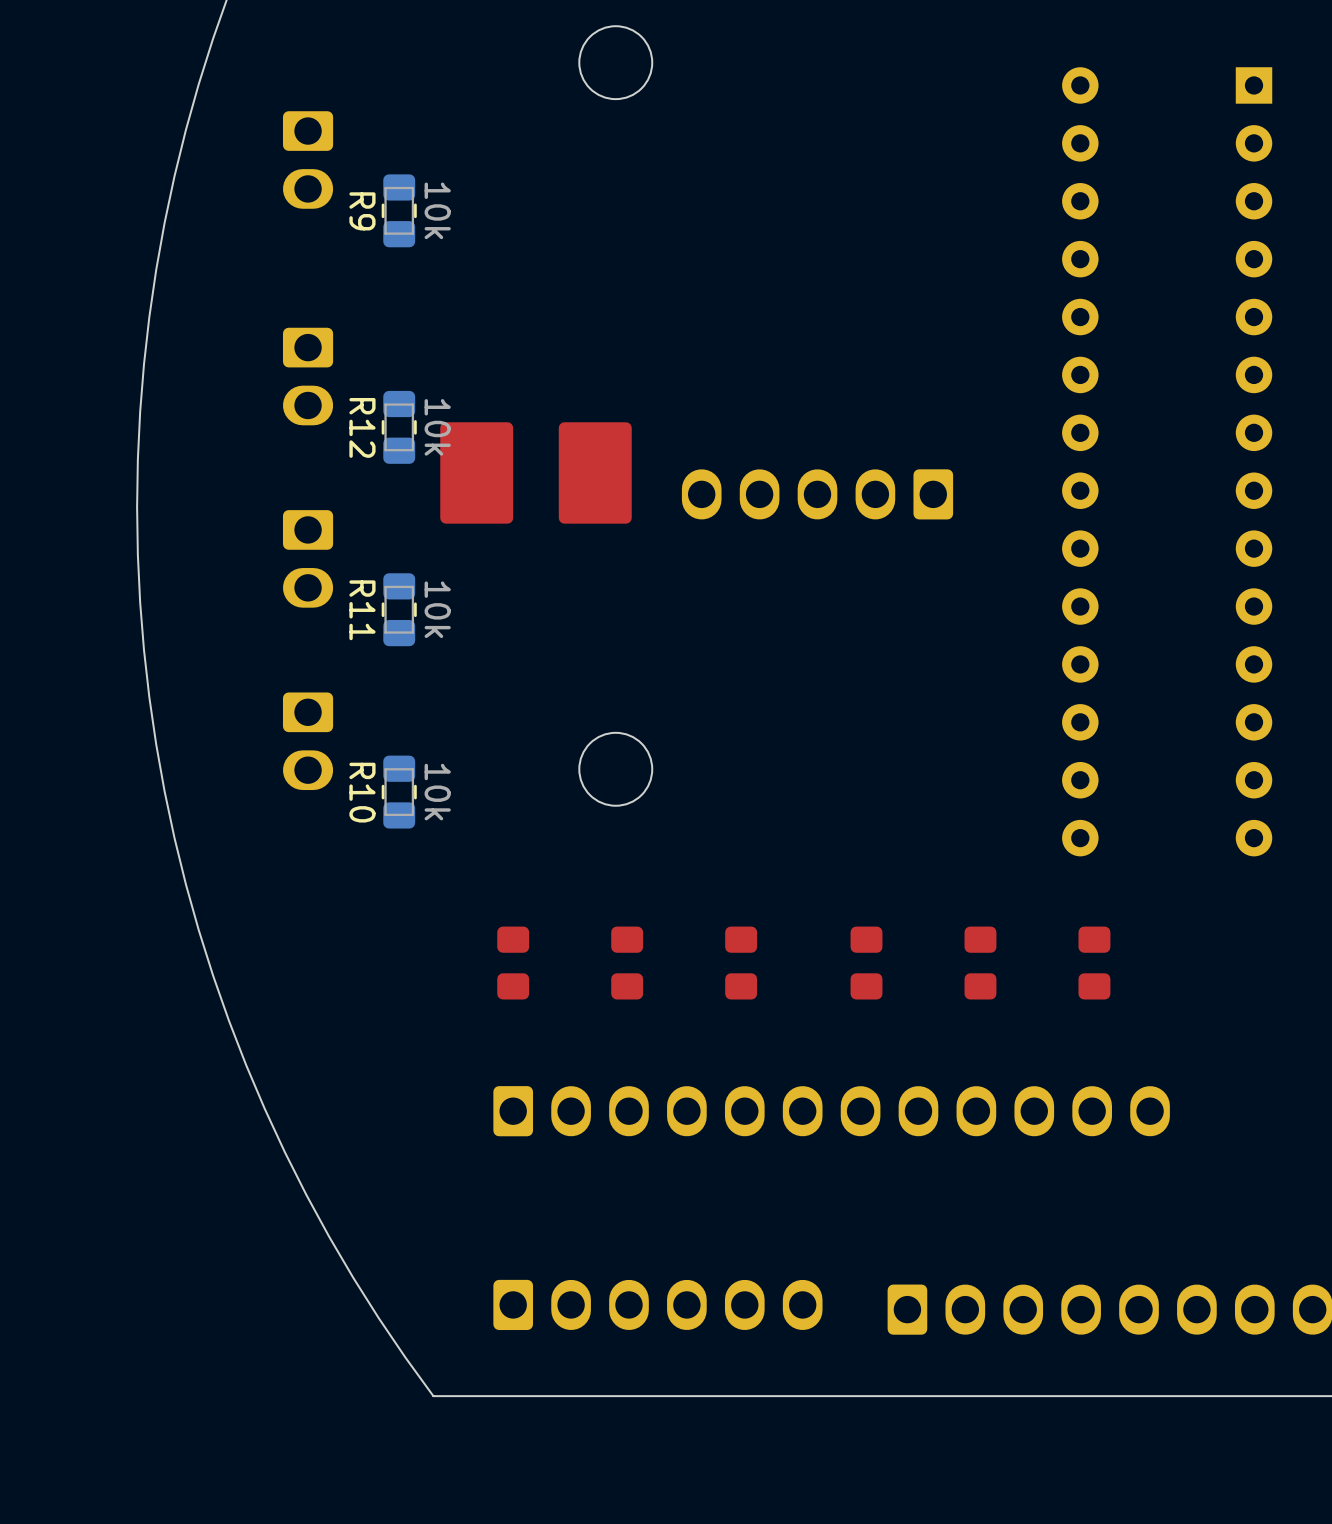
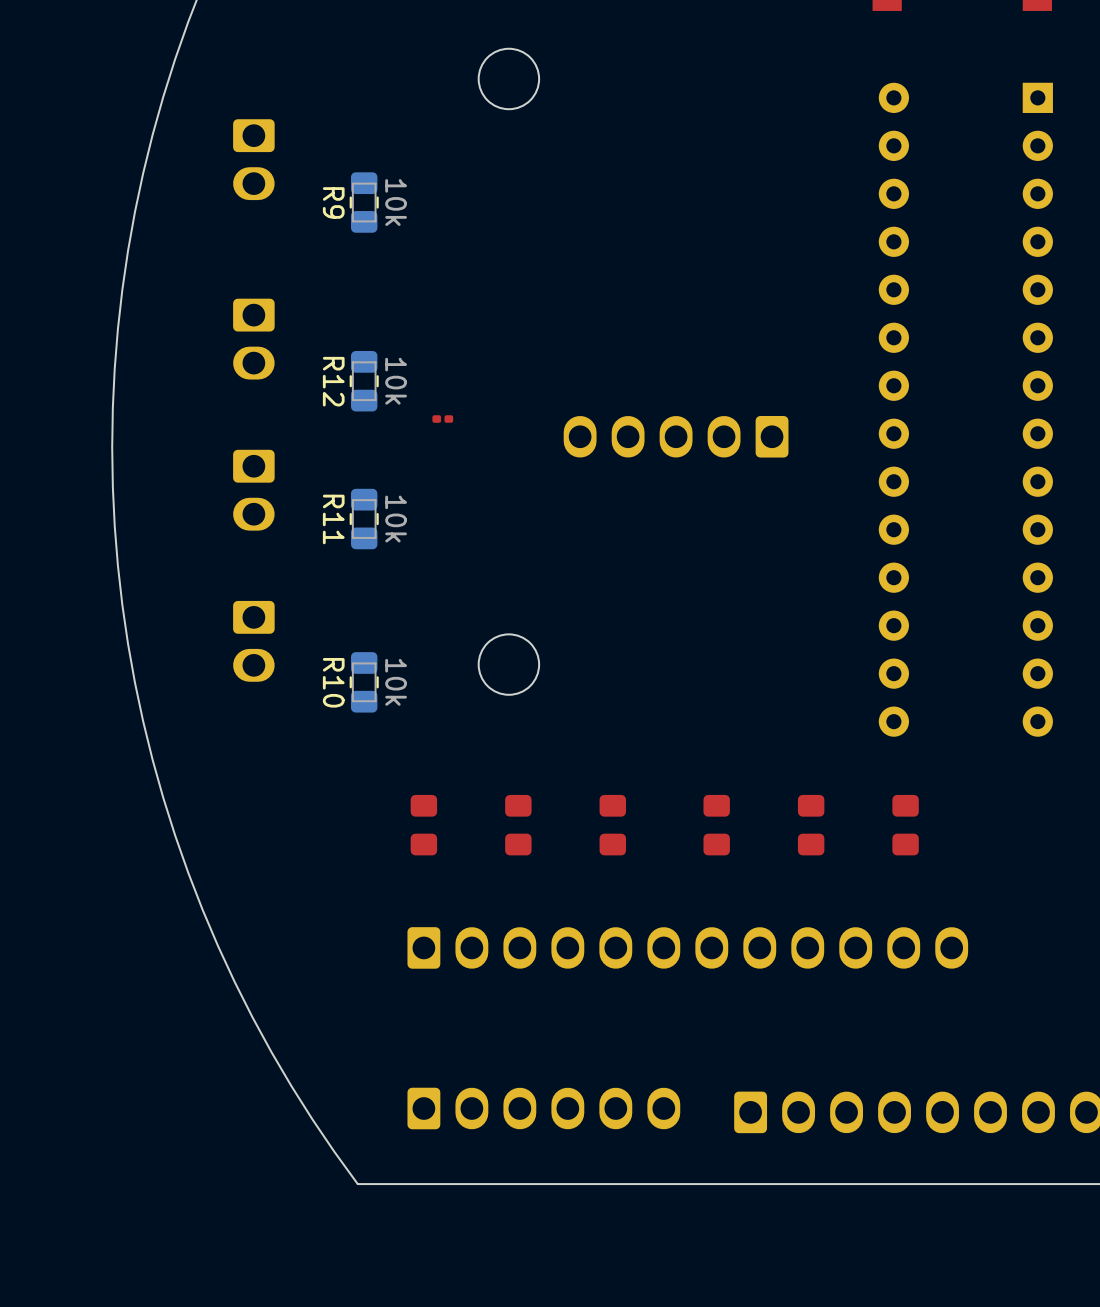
R9 position: (399, 210) -> (364, 202)
part footprint: [440, 422, 632, 524] -> [432, 415, 454, 423]
R12 position: (399, 427) -> (364, 381)
R11 position: (399, 609) -> (364, 519)
R10 position: (399, 792) -> (364, 682)

